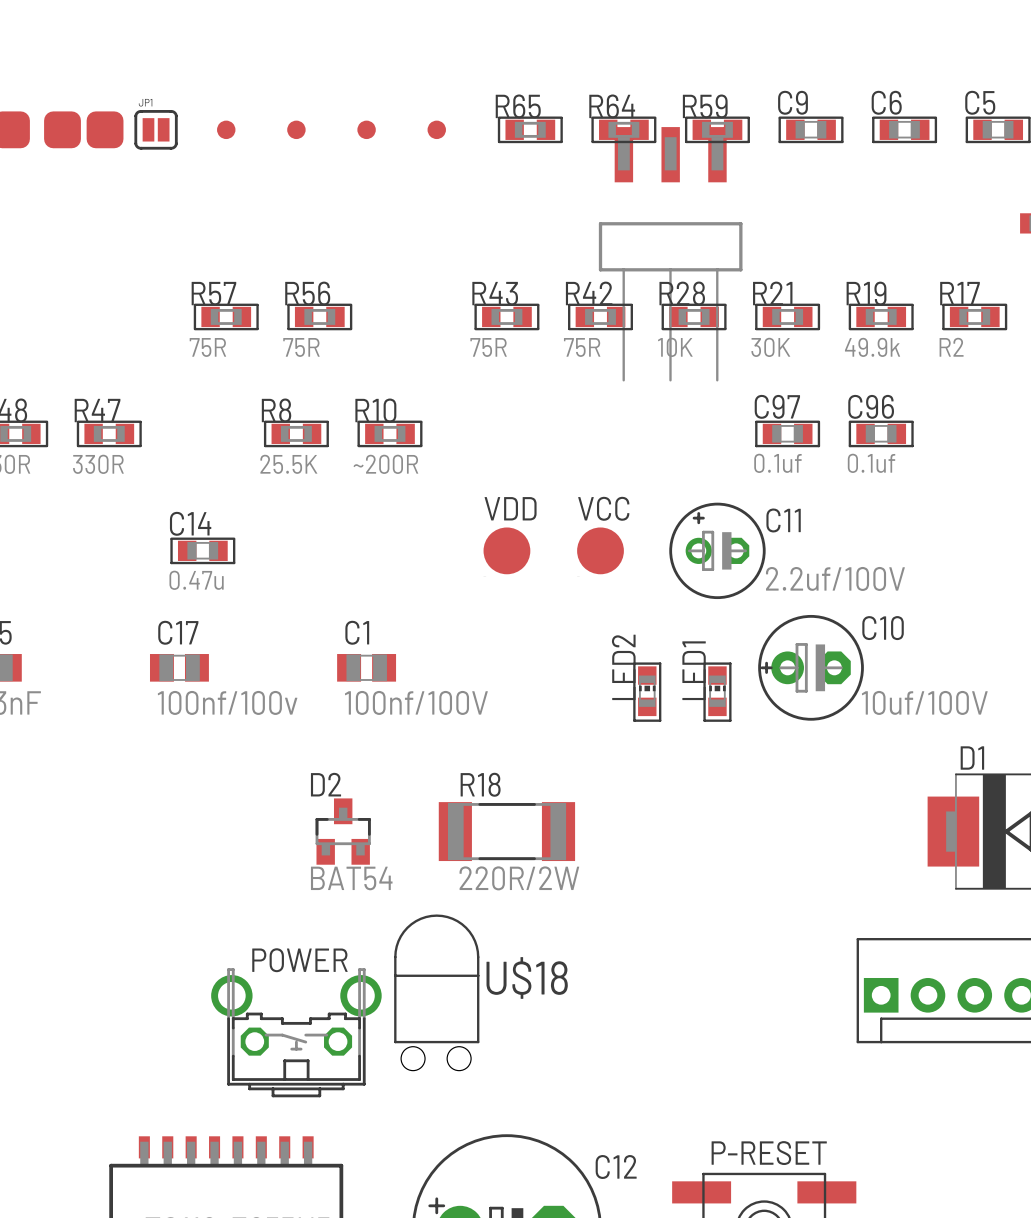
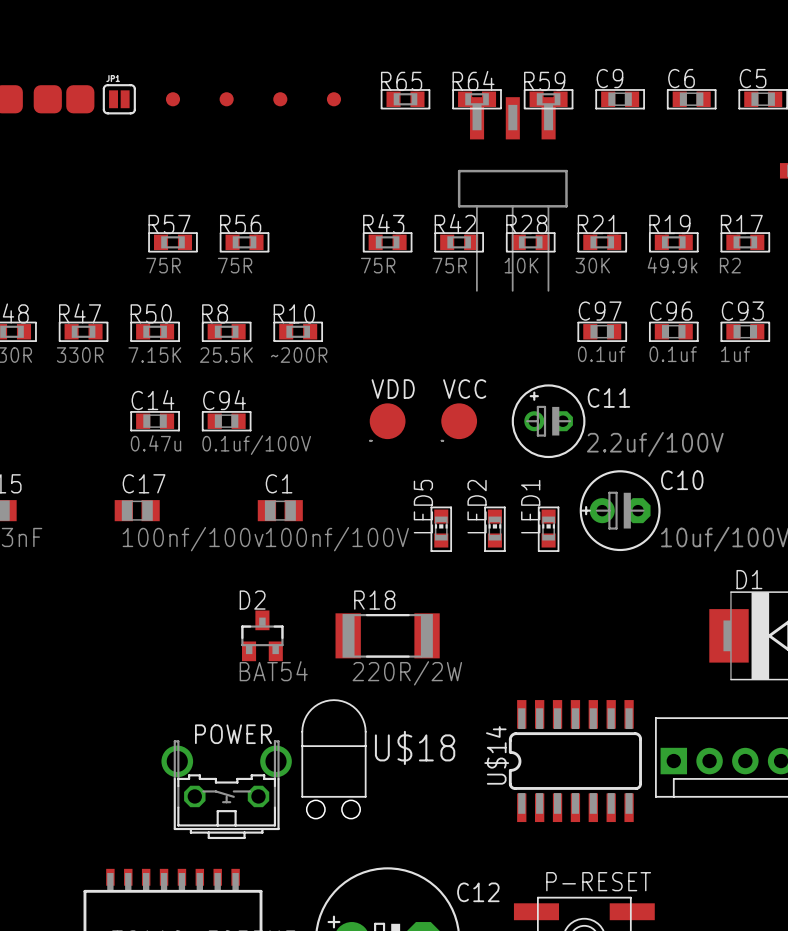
R50: none -> 7.15K (155, 331)
C93: none -> 1uf (745, 331)
C94: none -> 0.1uf/100V (226, 421)
LED5: none -> (441, 529)
U$14: none -> (575, 761)

